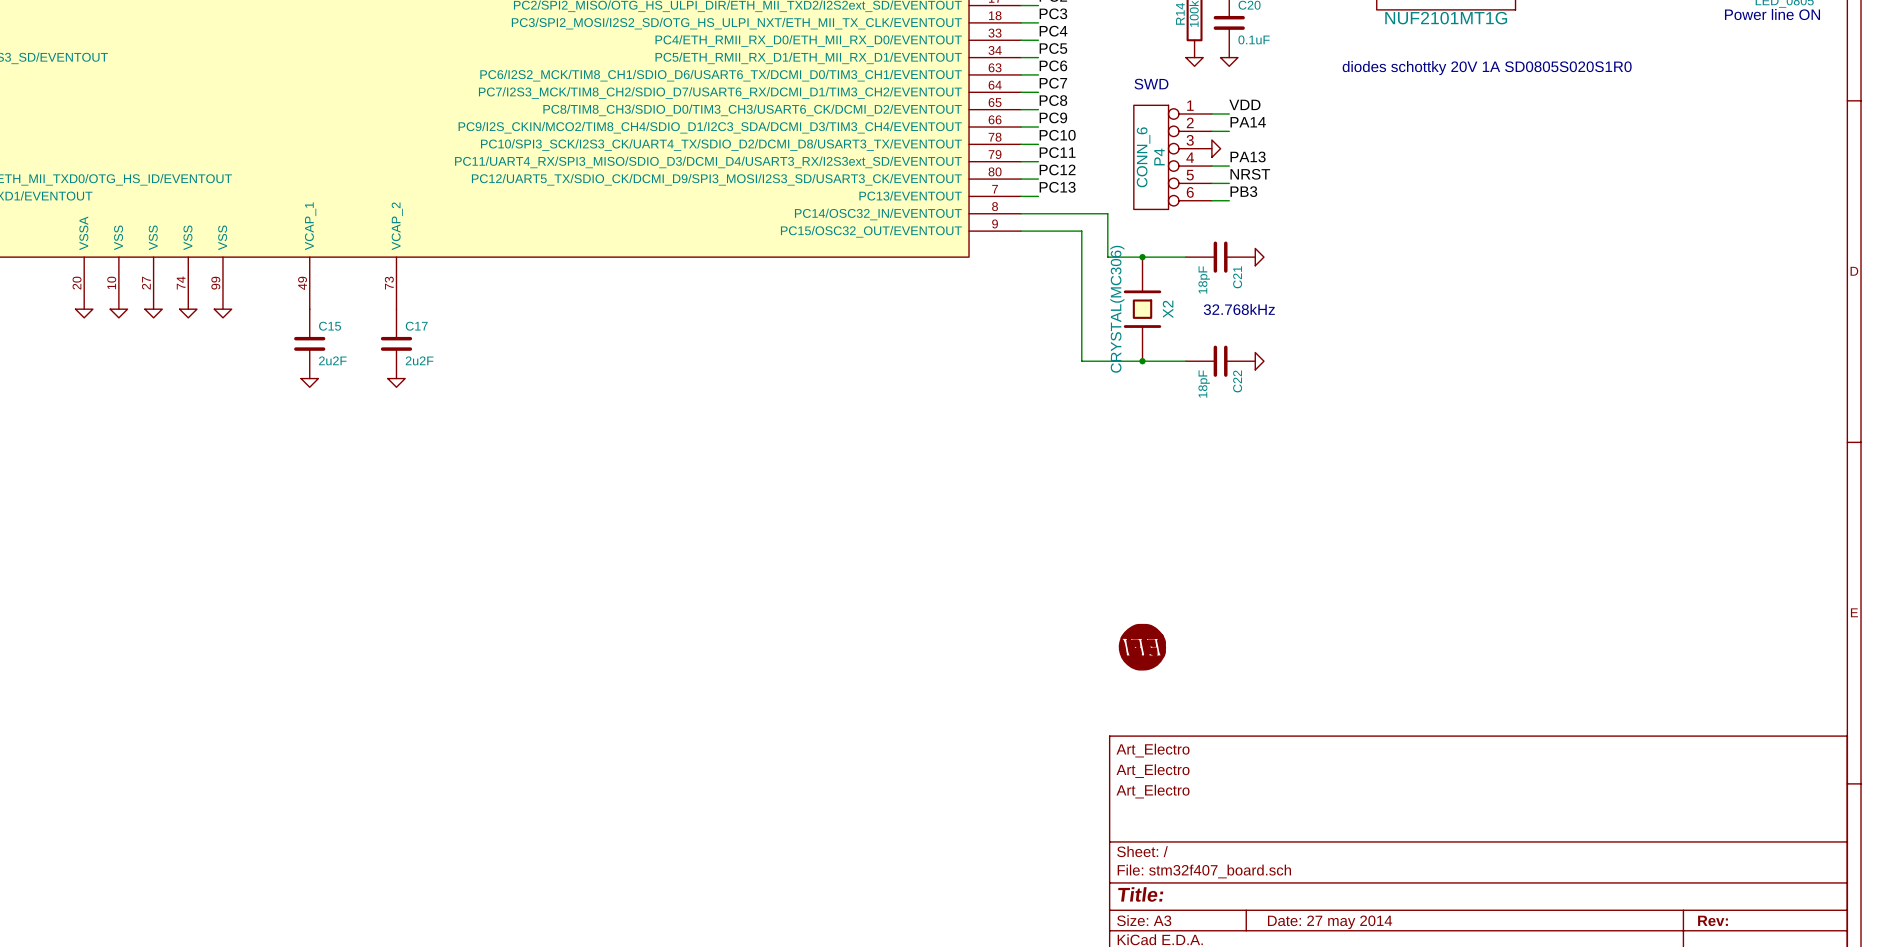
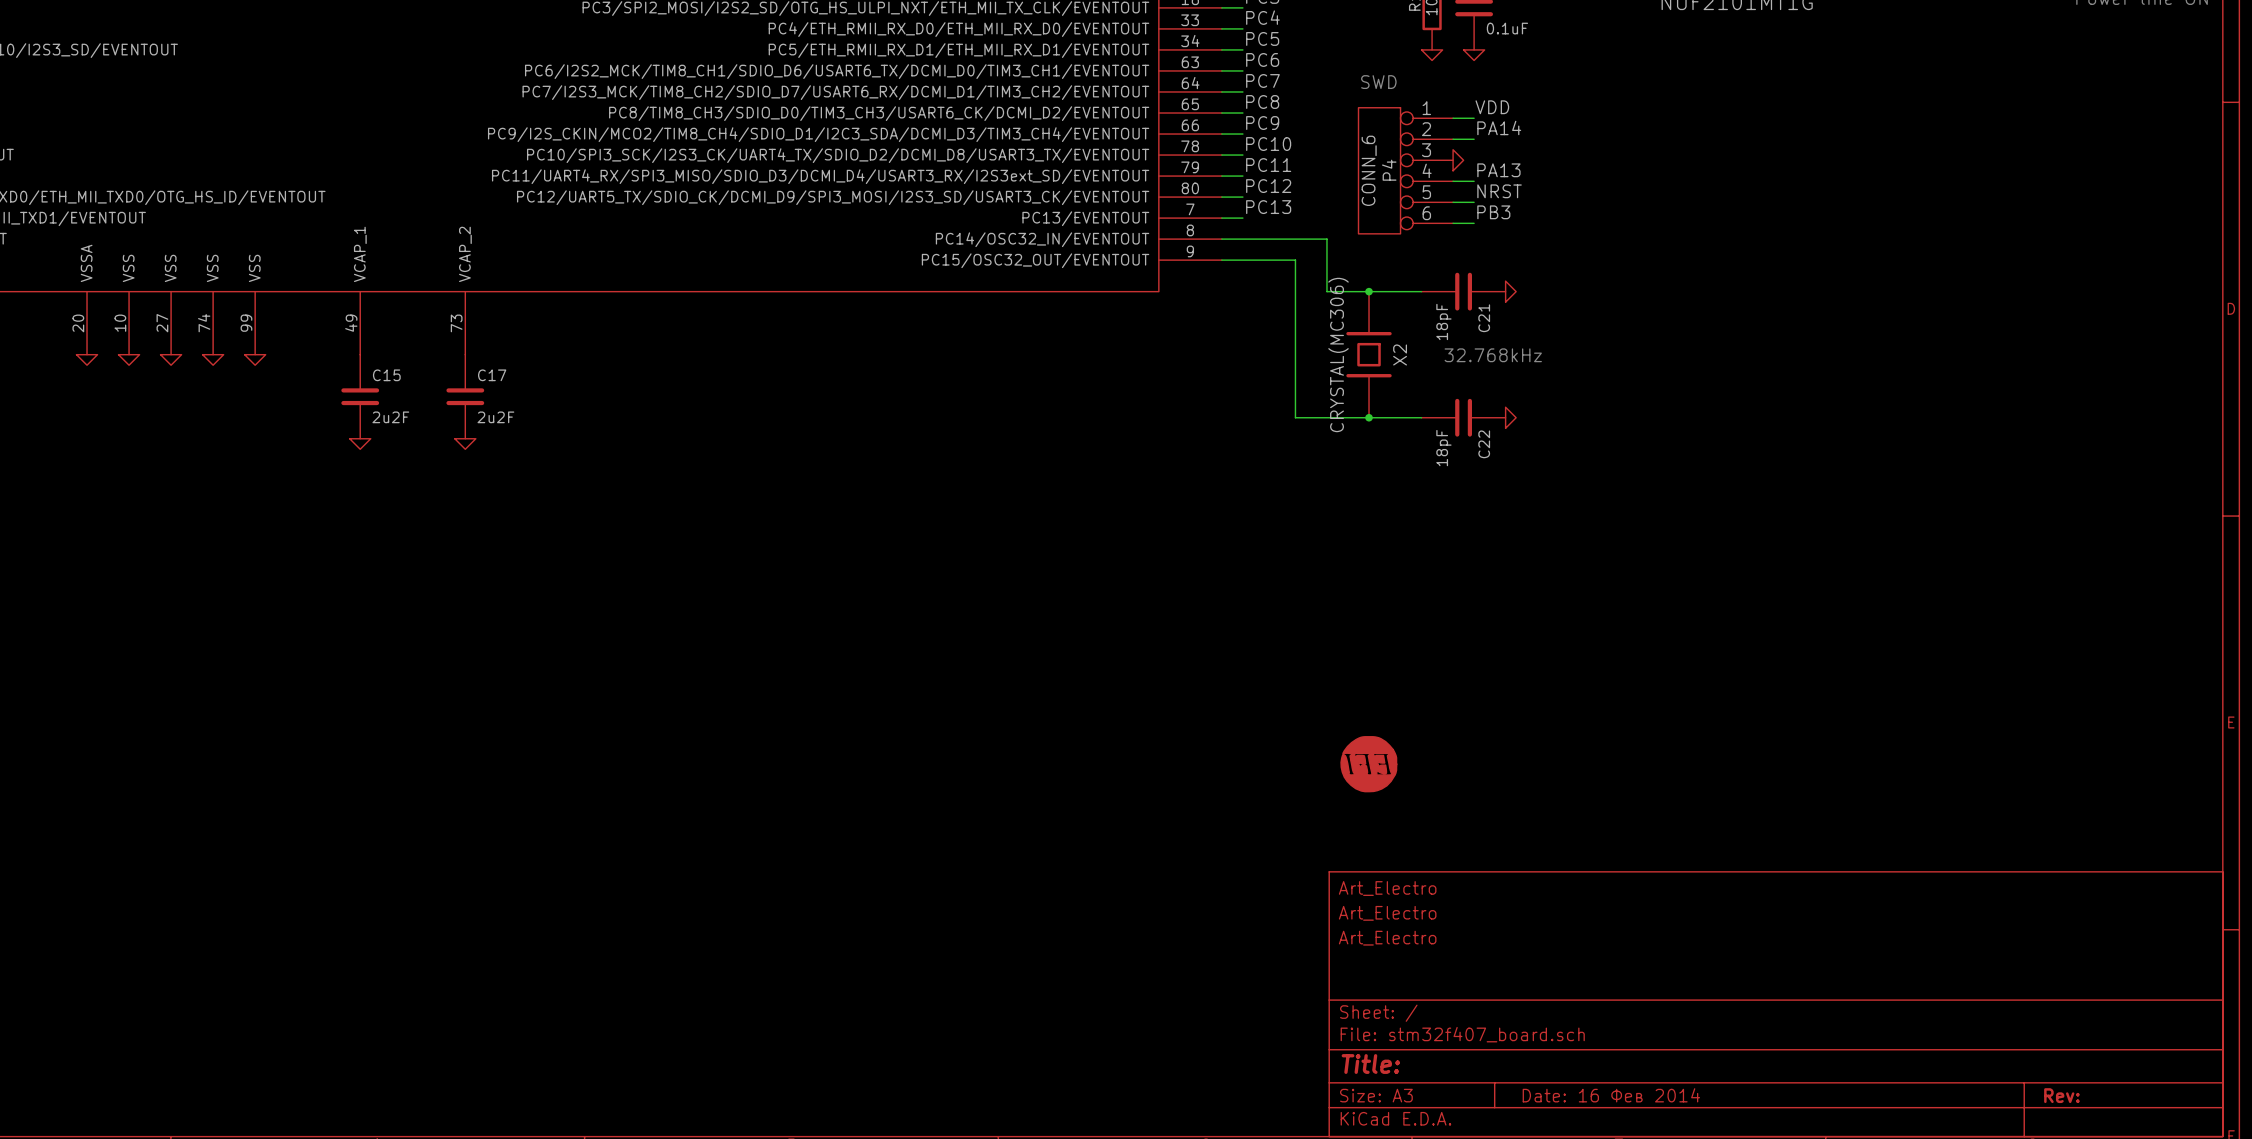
text: diodes schottky 20V 1A SD0805S020S1R0 (1487, 68) -> none
title block: Date: 27 may 2014 (1330, 922) -> Date: 16 Фев 2014 (1611, 1095)

